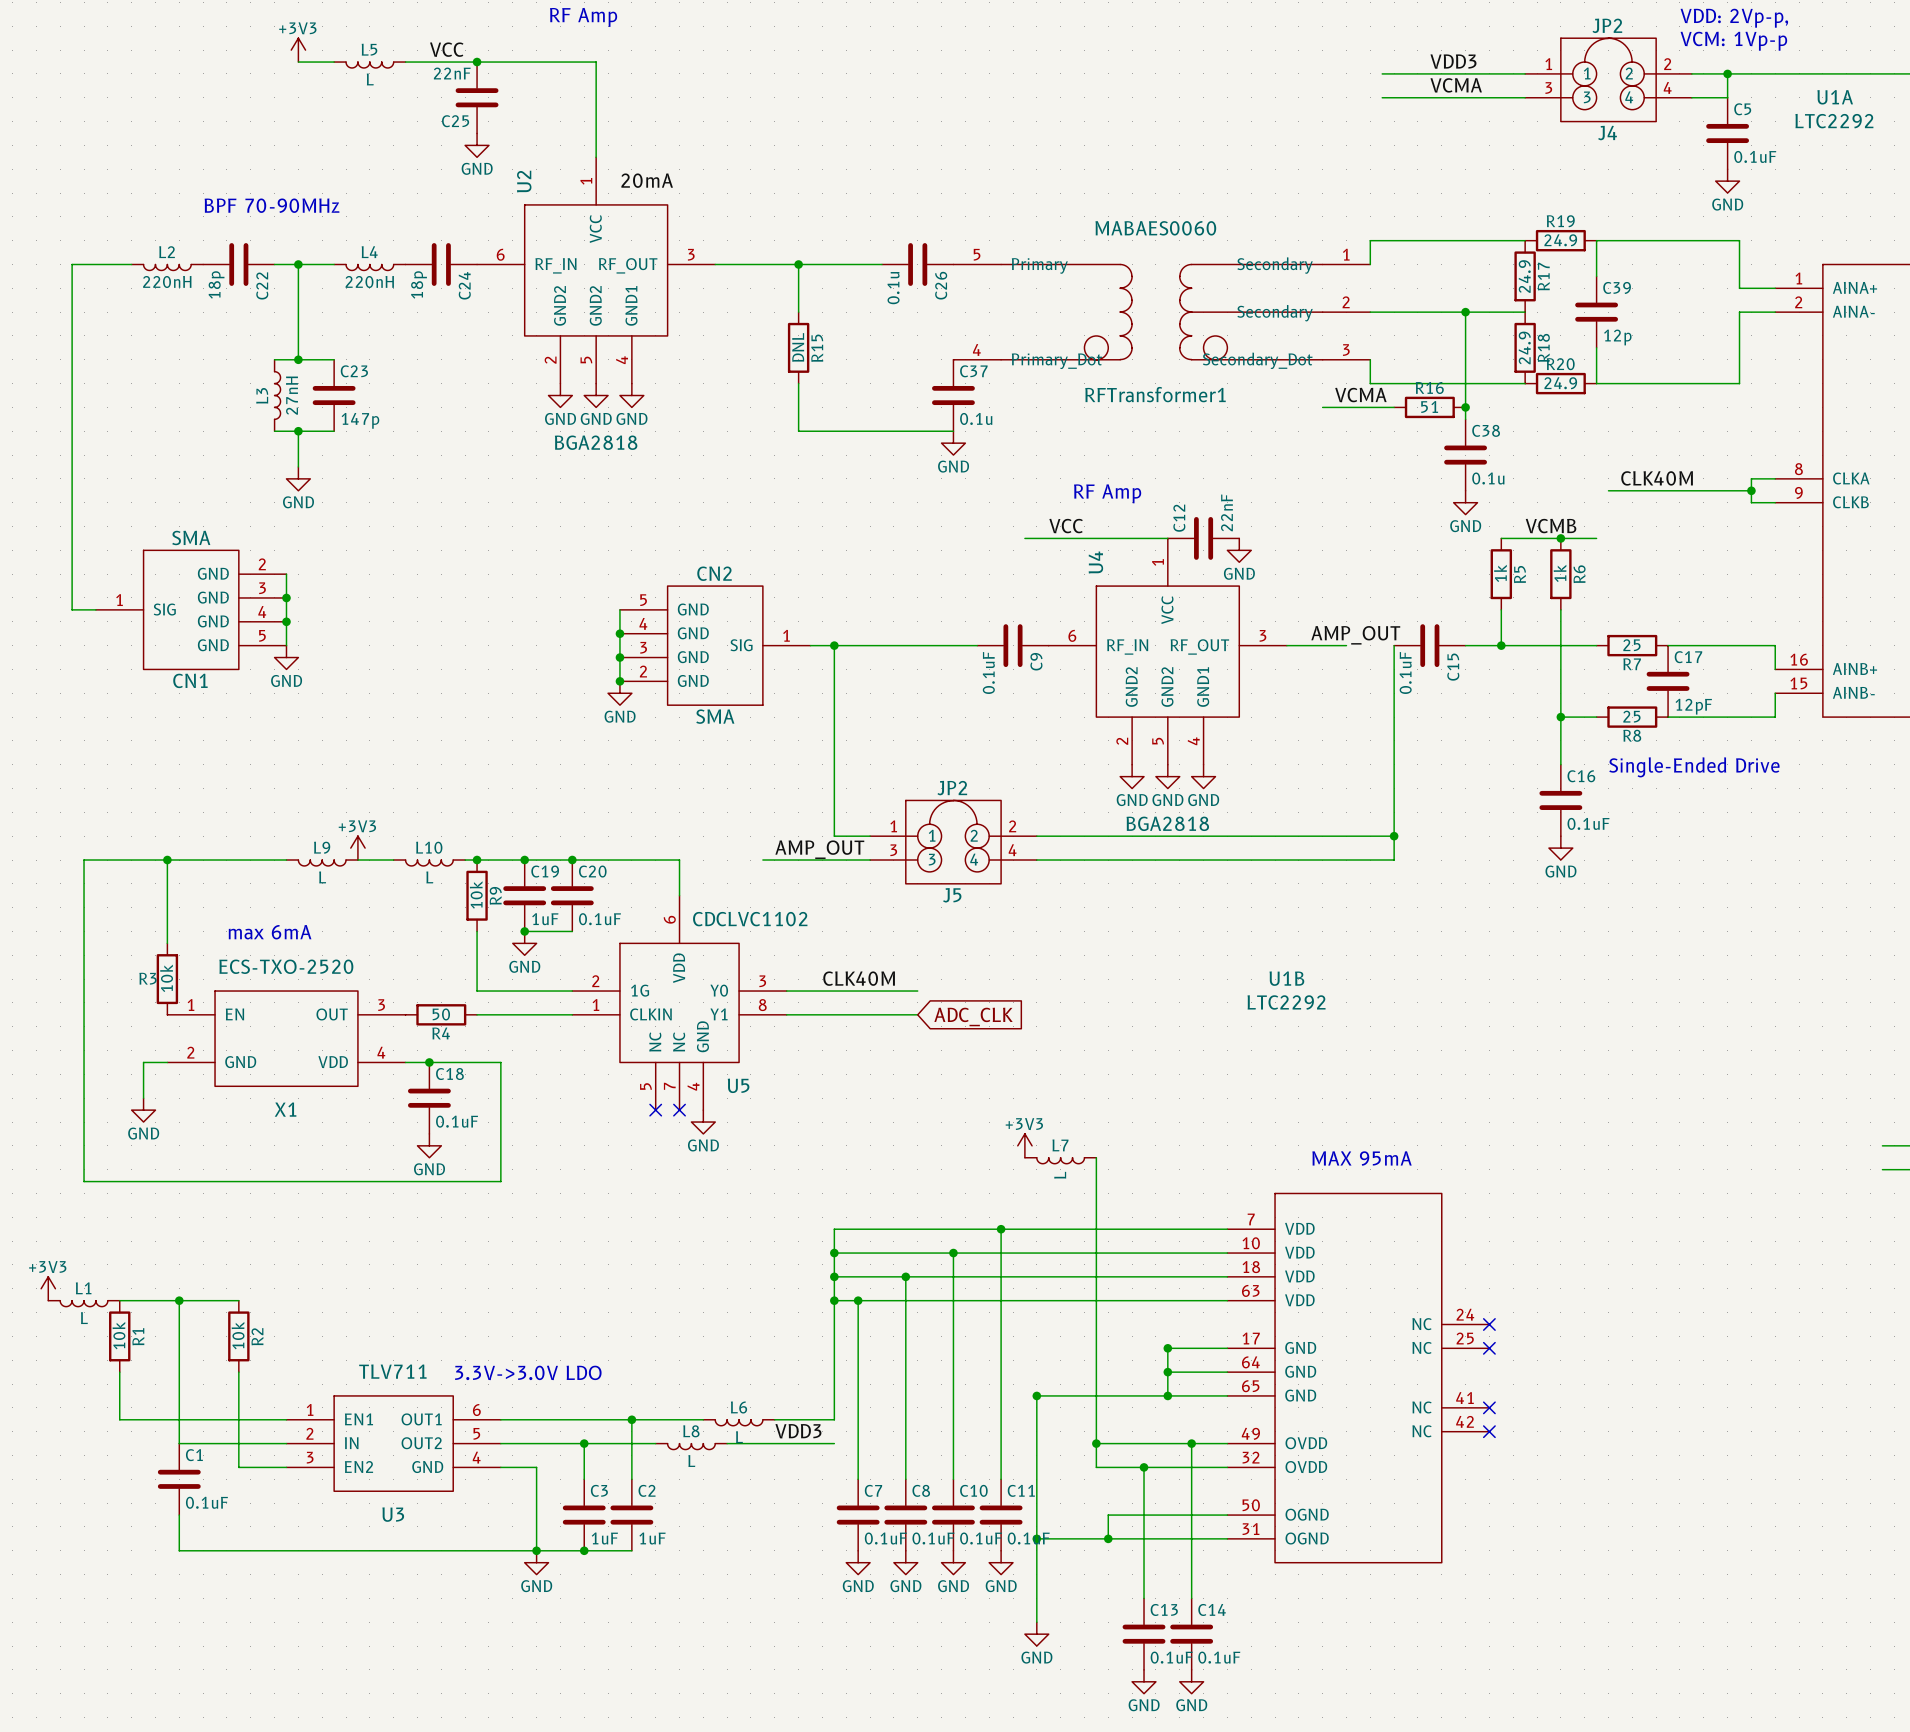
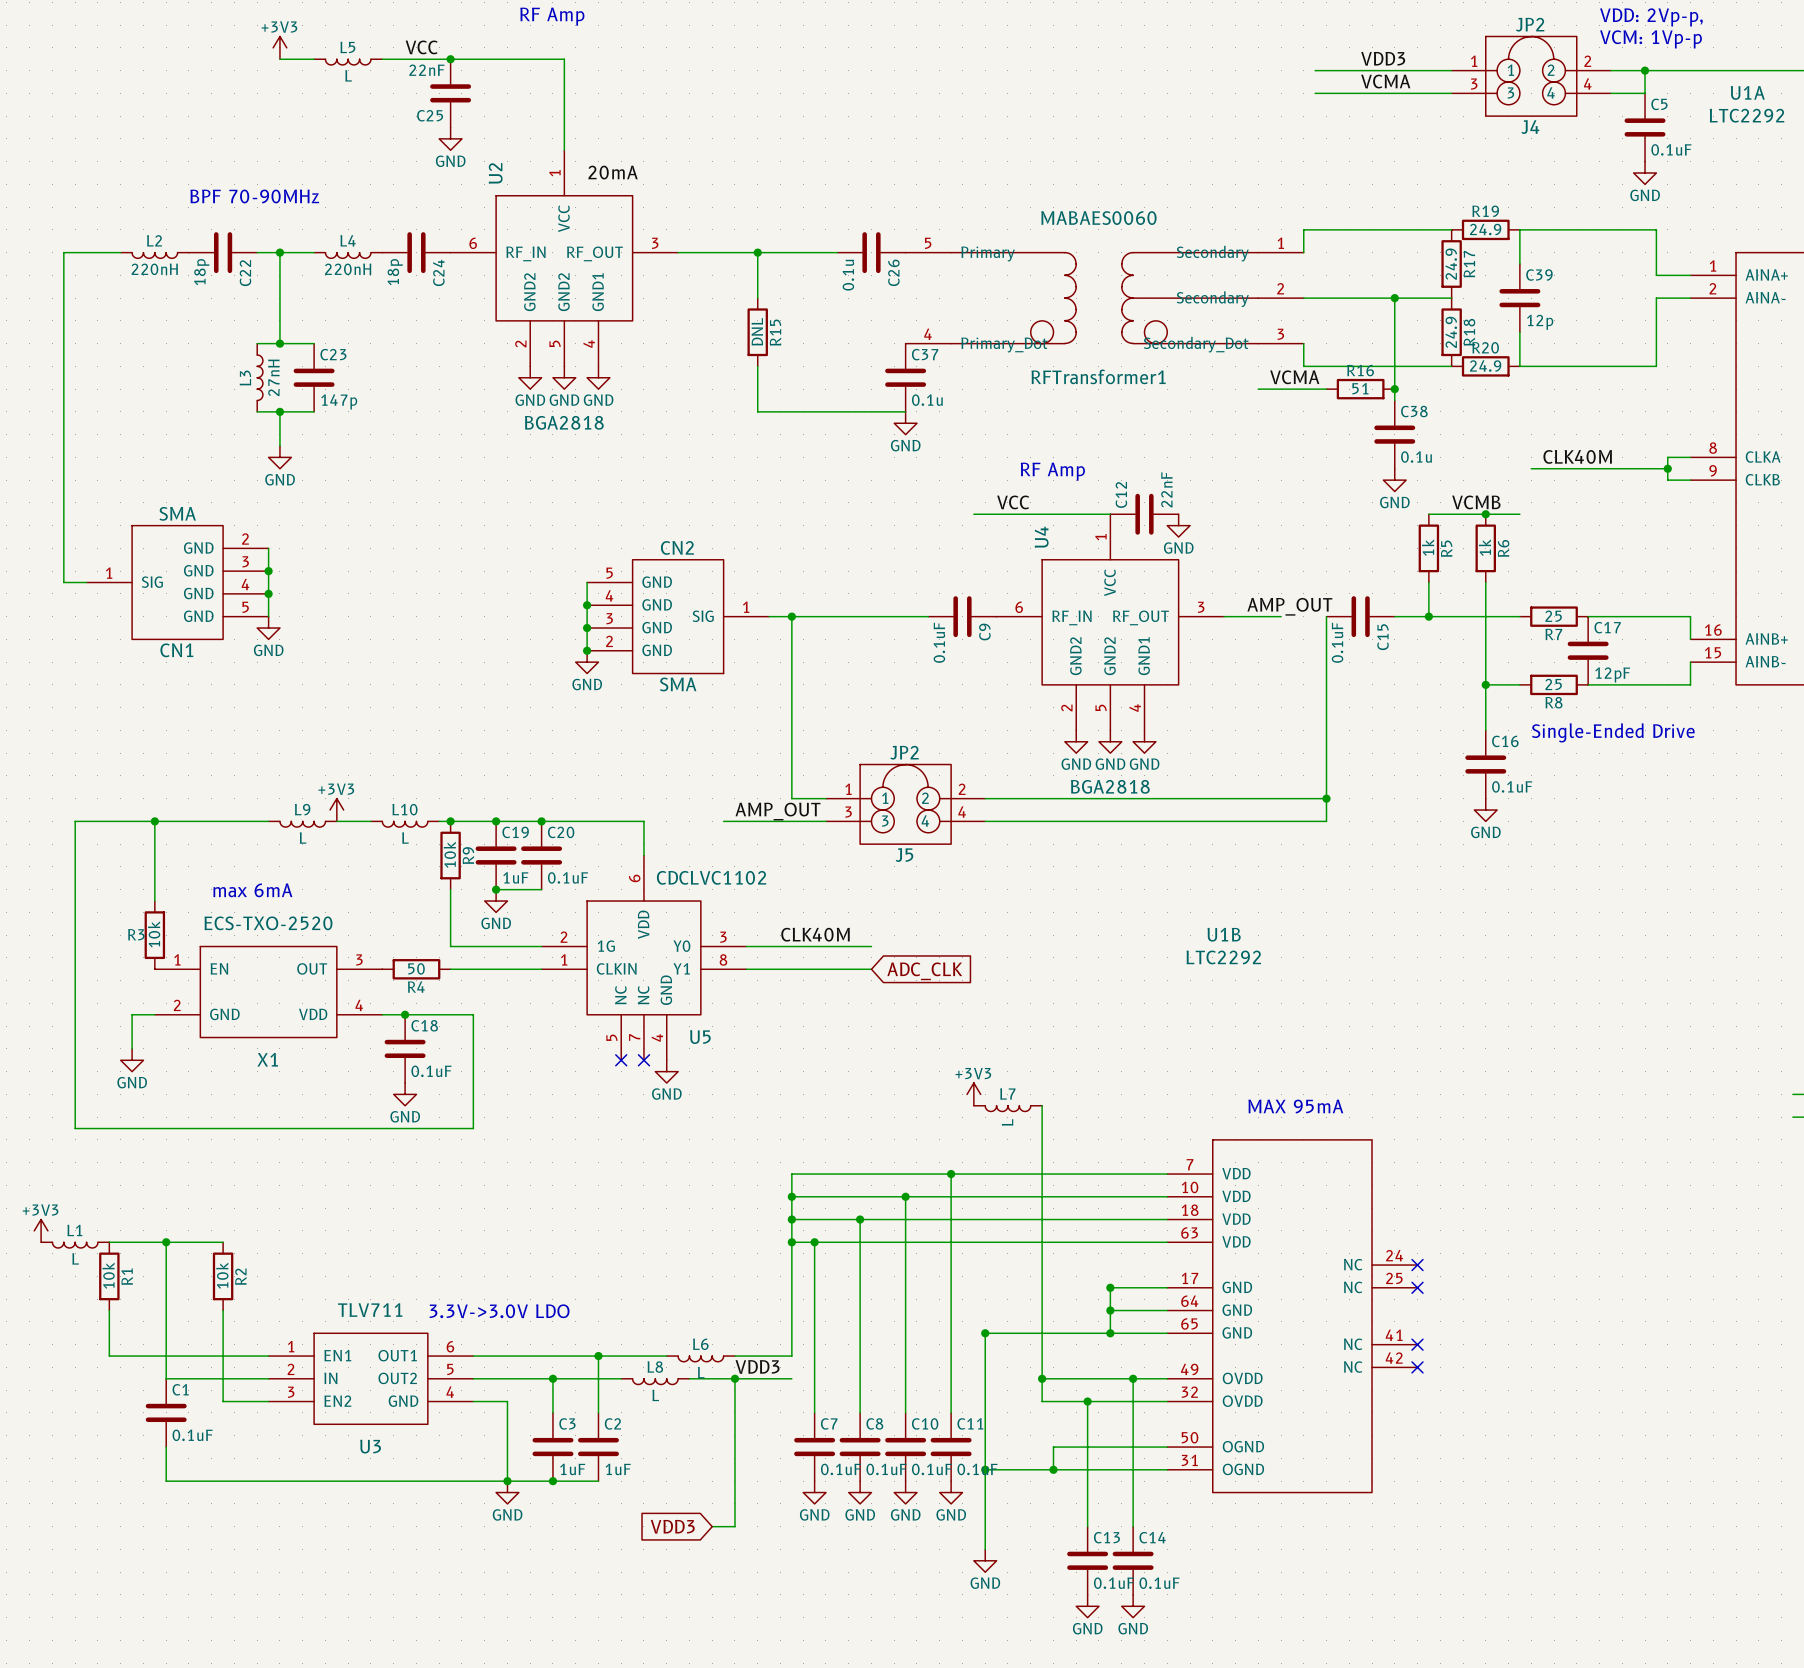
wire: none -> (734, 1378) (734, 1526) (712, 1526)
junction: none -> (734, 1378)
global label: none -> VDD3 (672, 1526)

